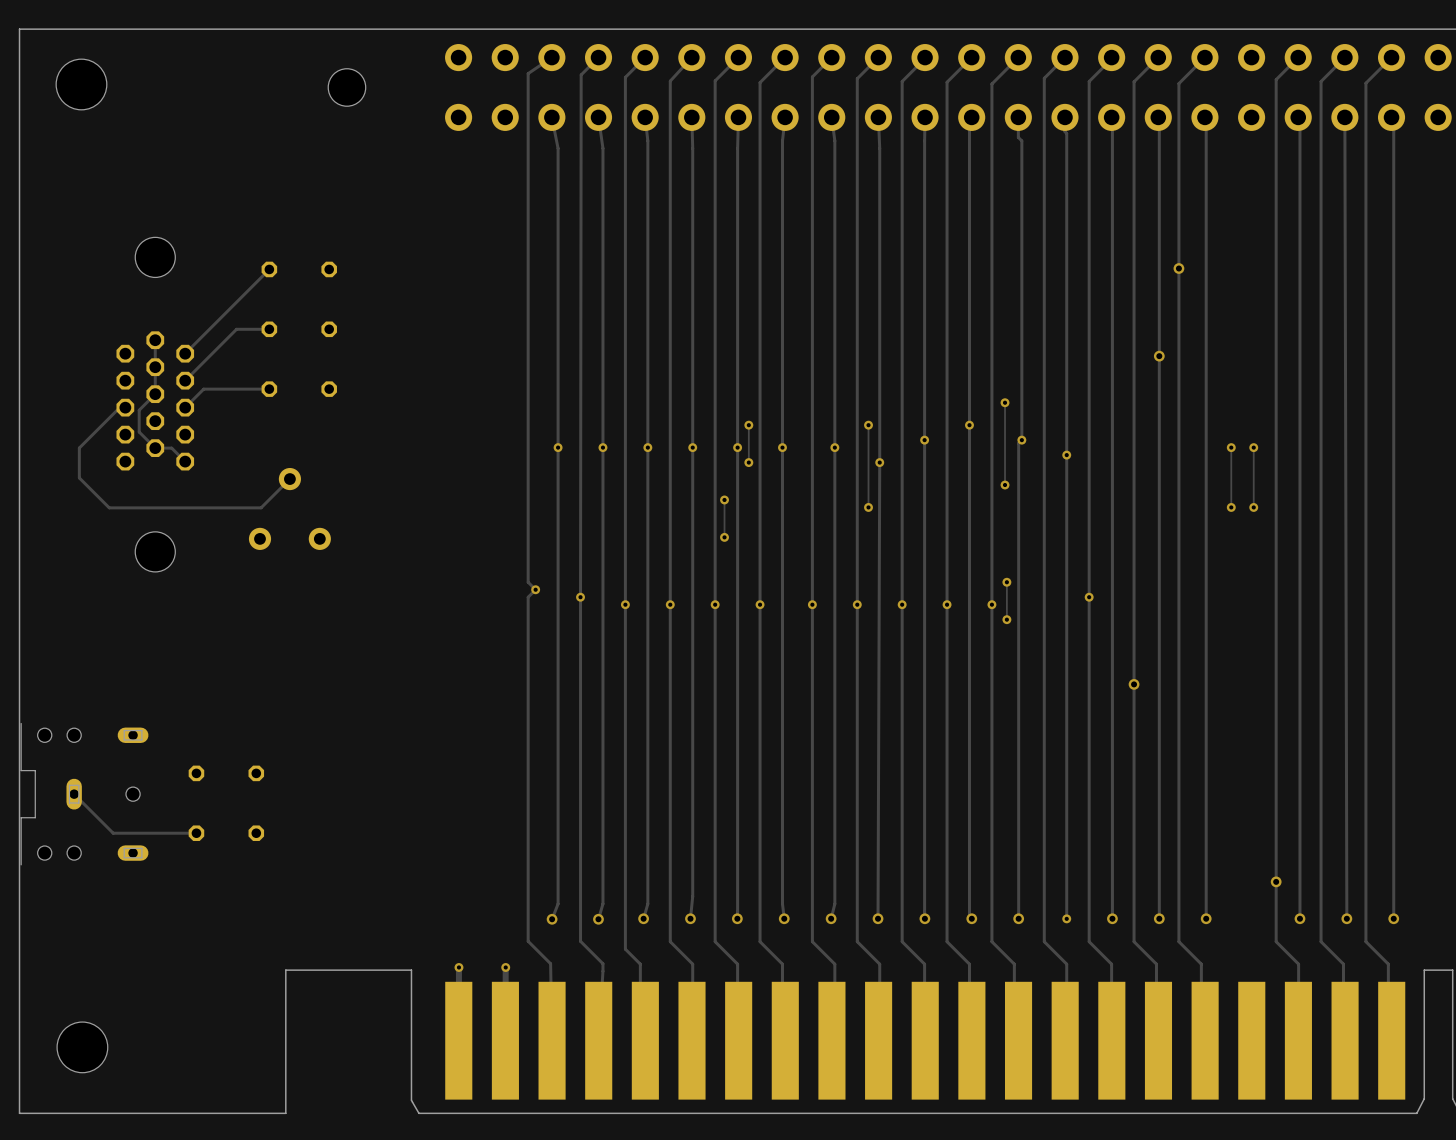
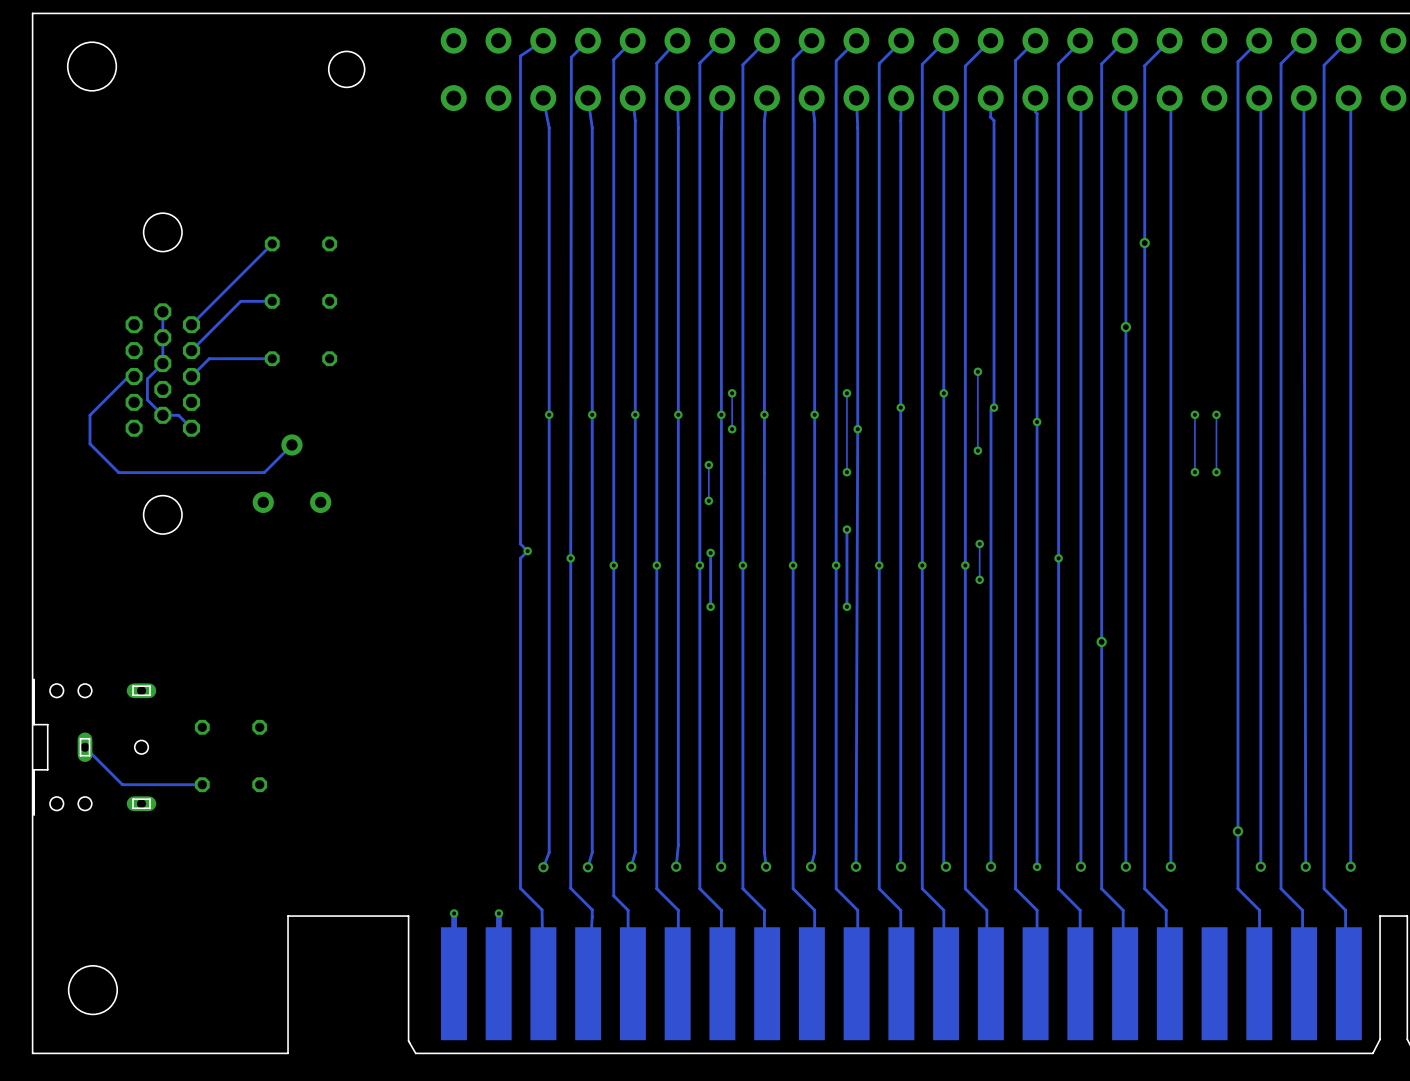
track: none -> (846, 529) (846, 606)
via: none -> (846, 529)
track: none -> (710, 552) (710, 606)
via: none -> (710, 552)
via: none -> (710, 606)
via: none -> (846, 606)

